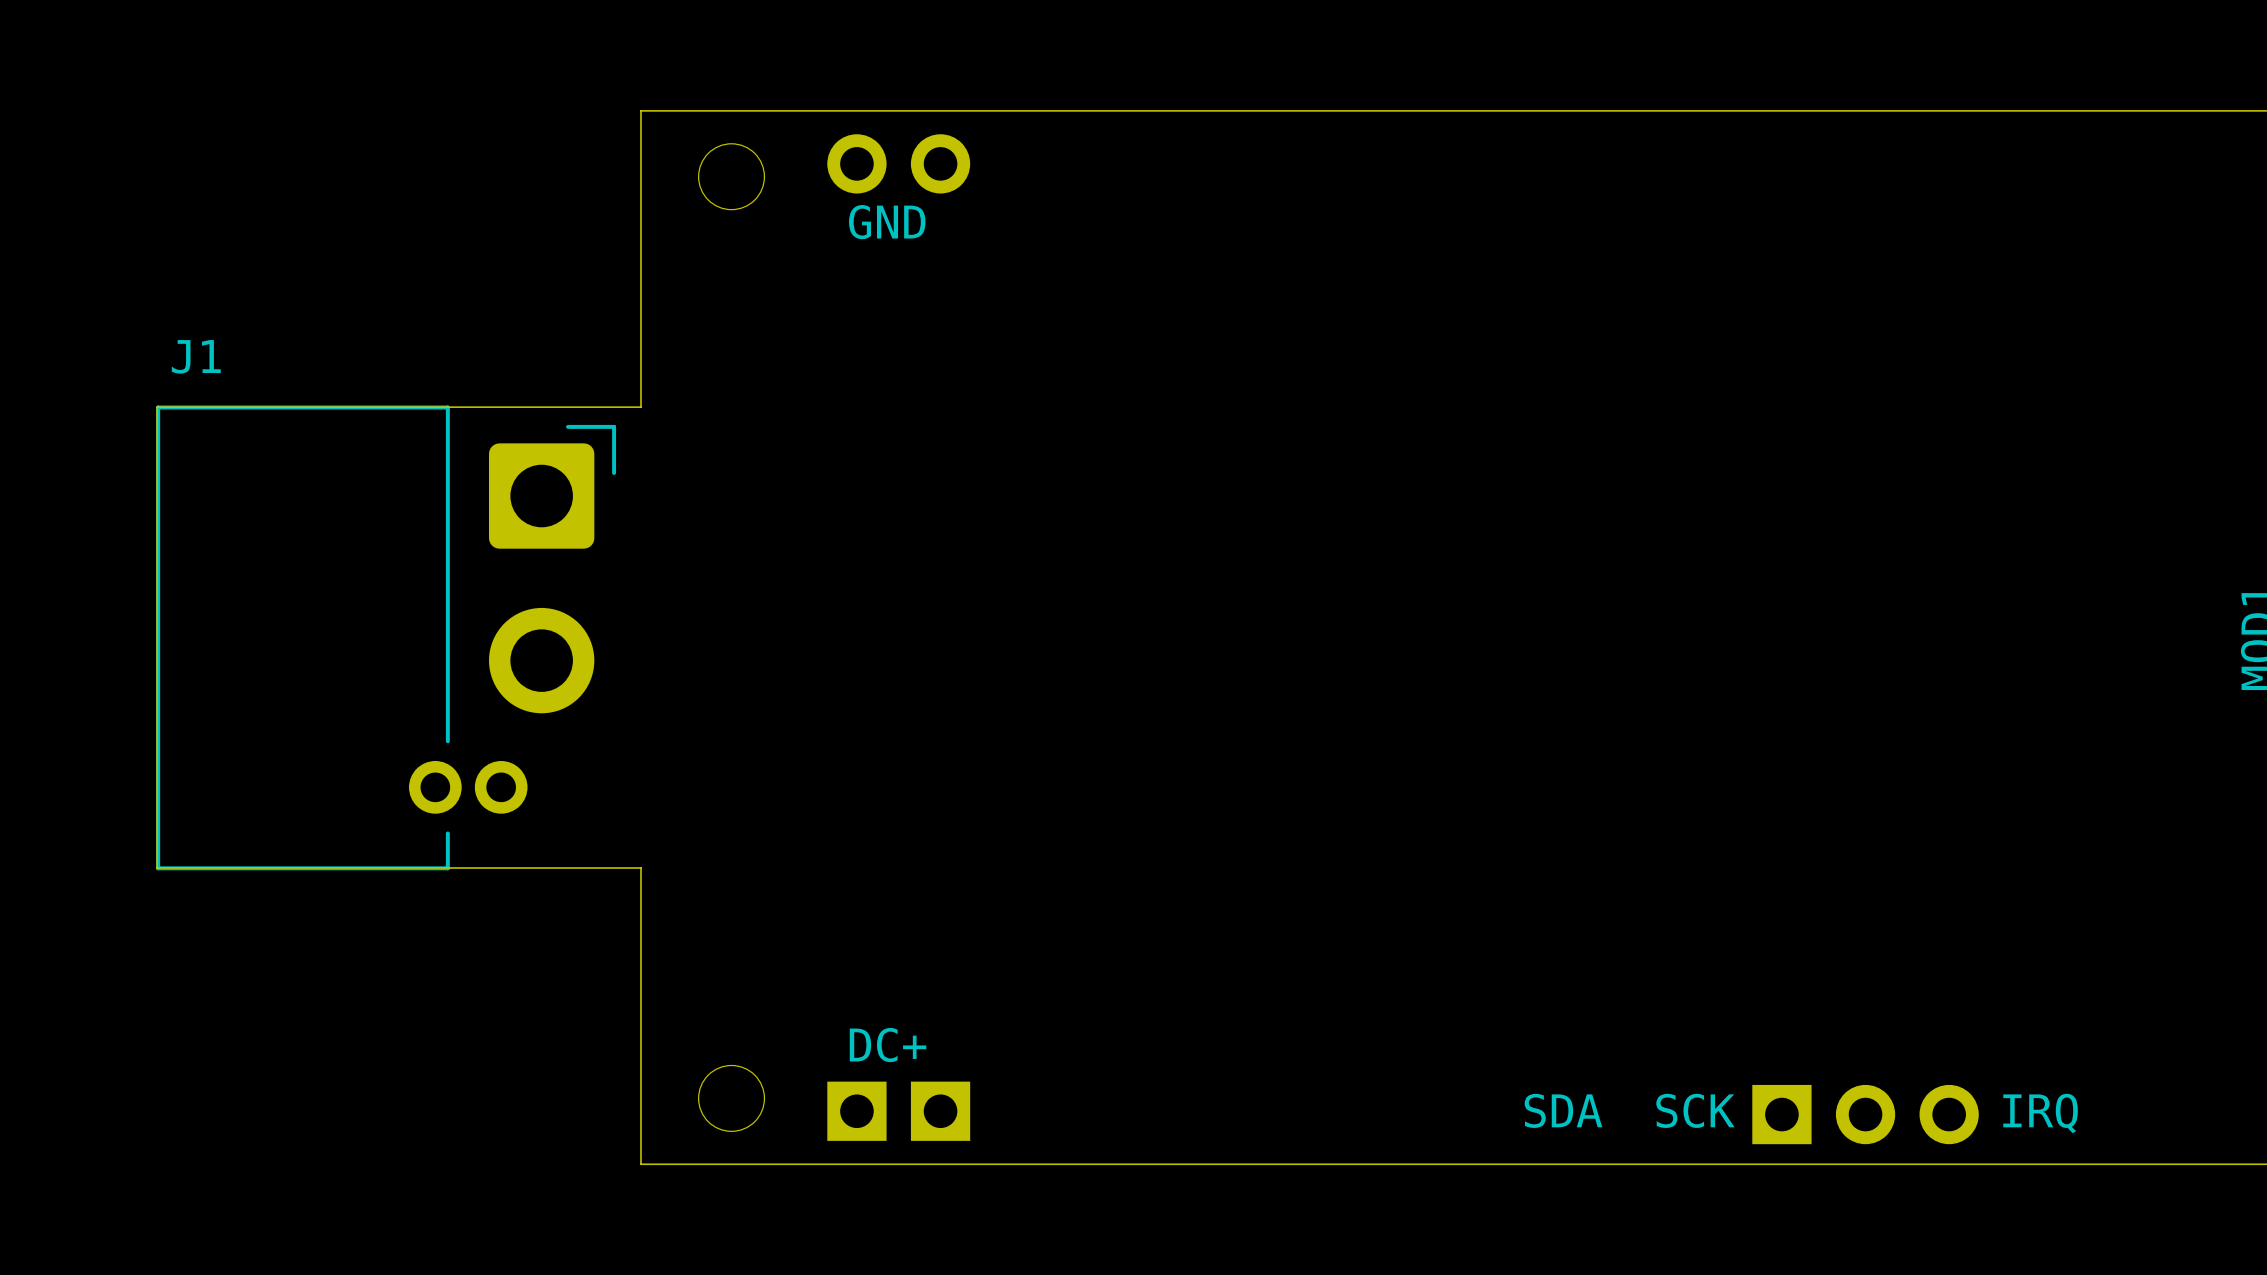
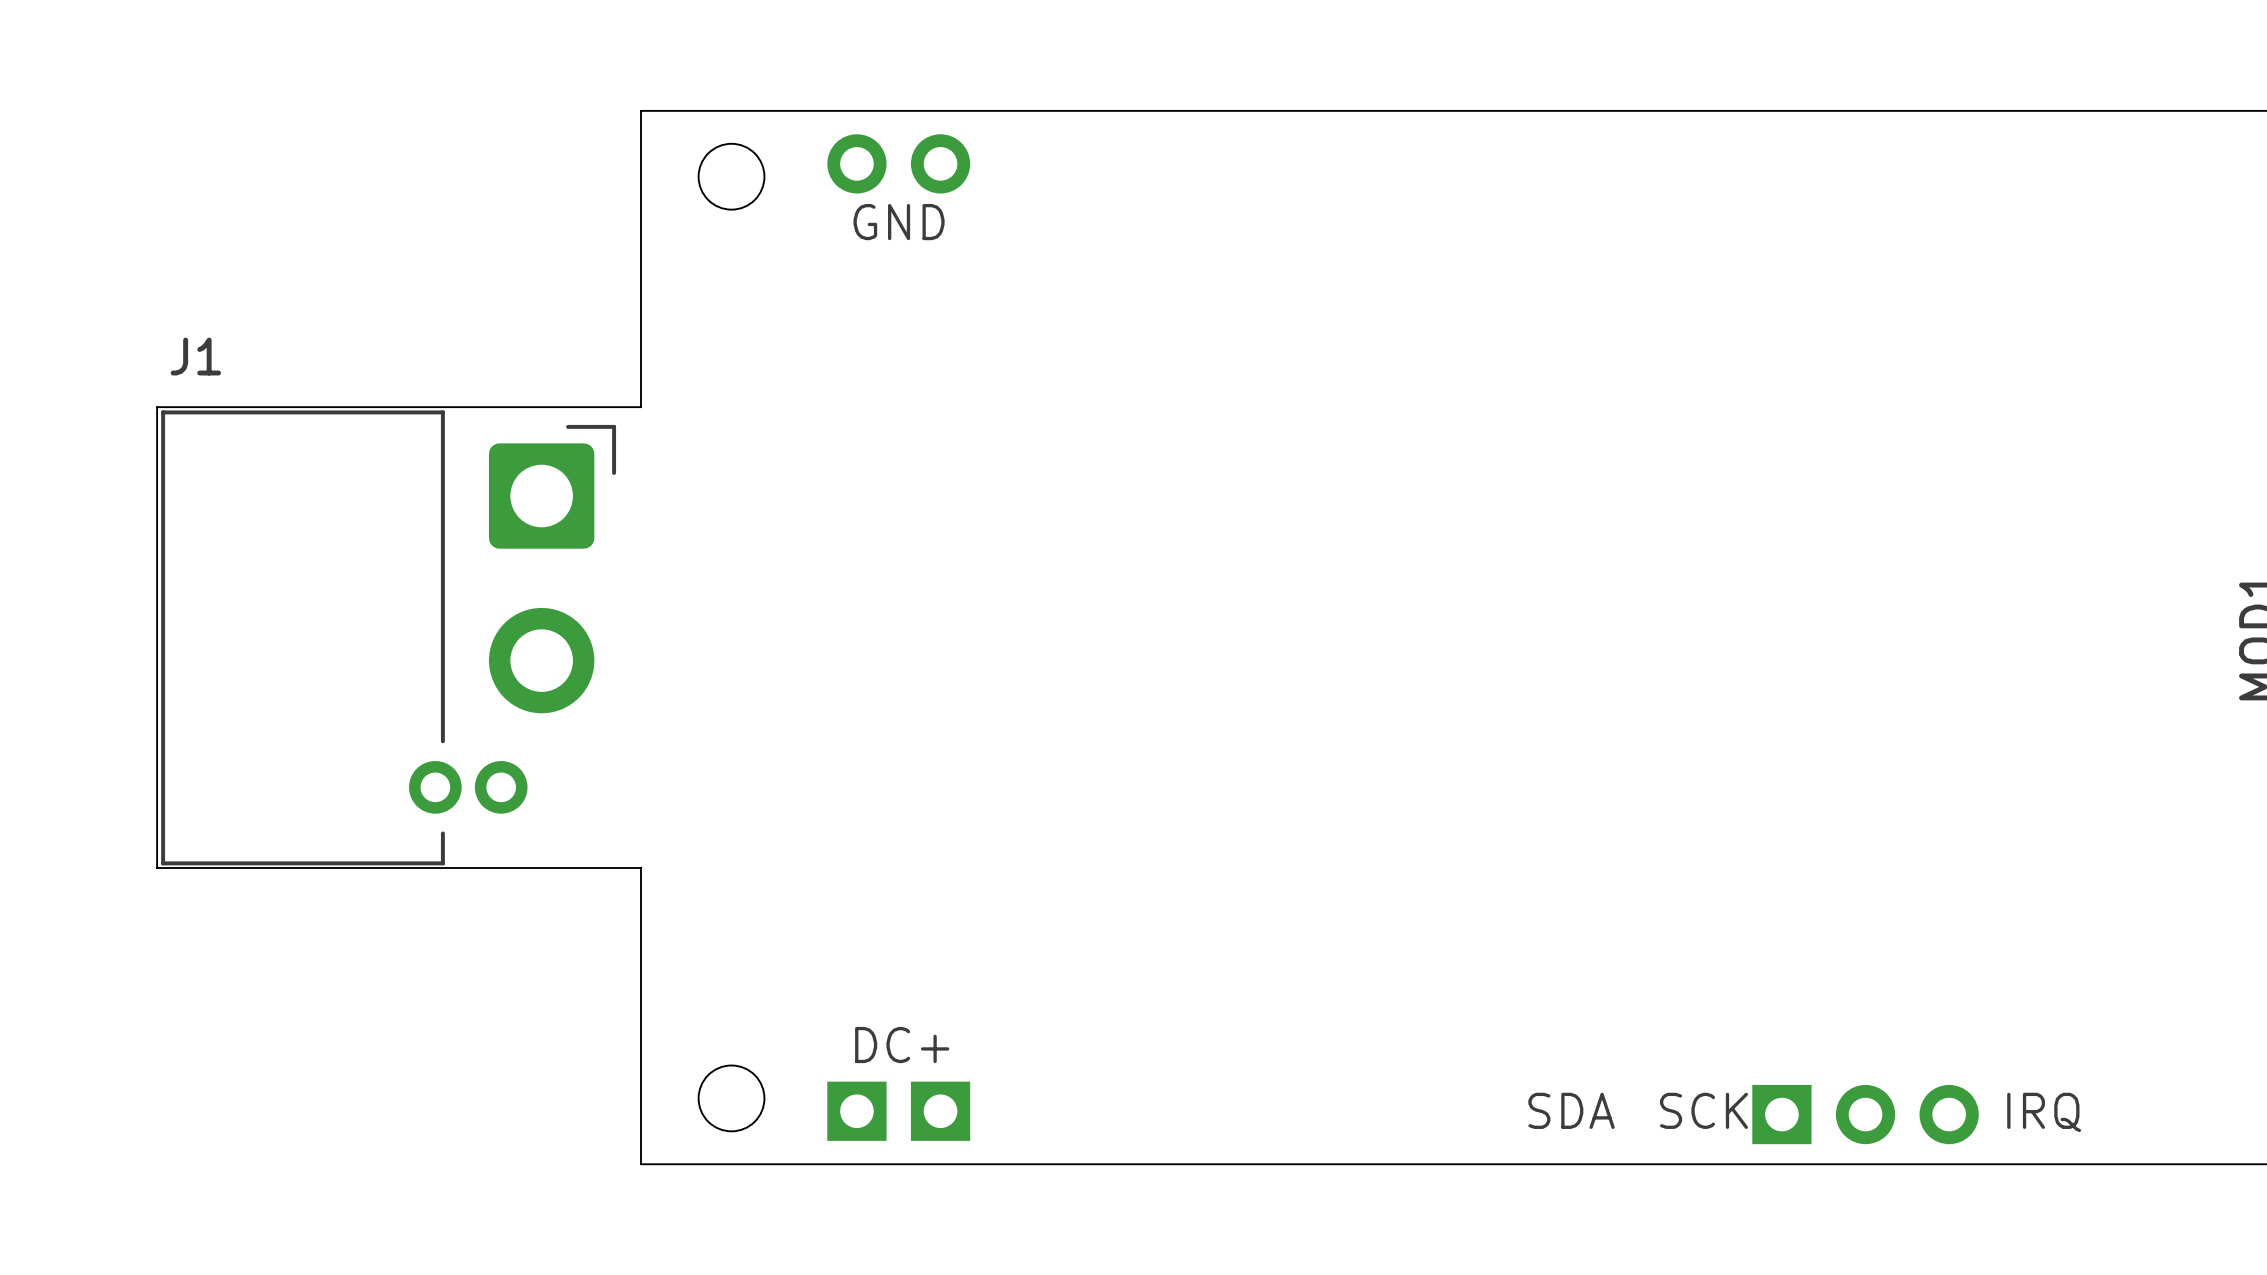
J1 footprint: [156, 405, 617, 871] -> [161, 410, 617, 866]

